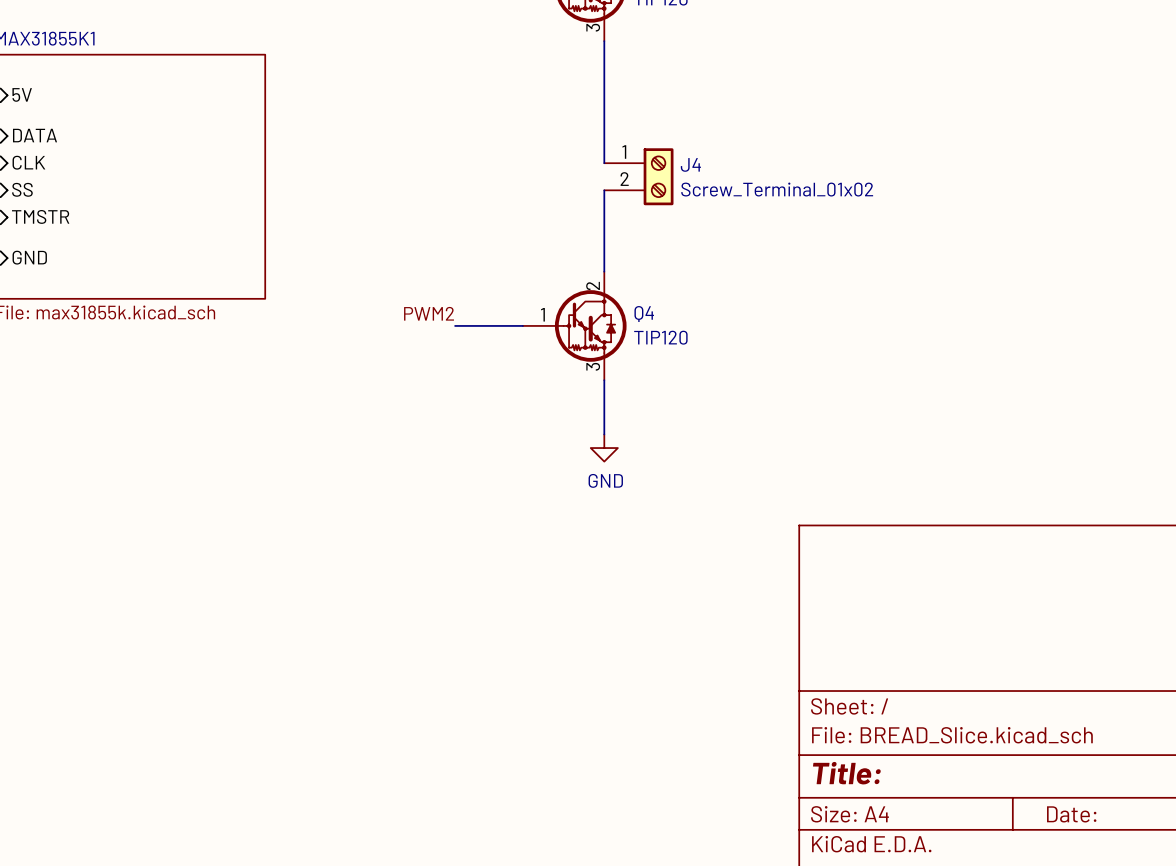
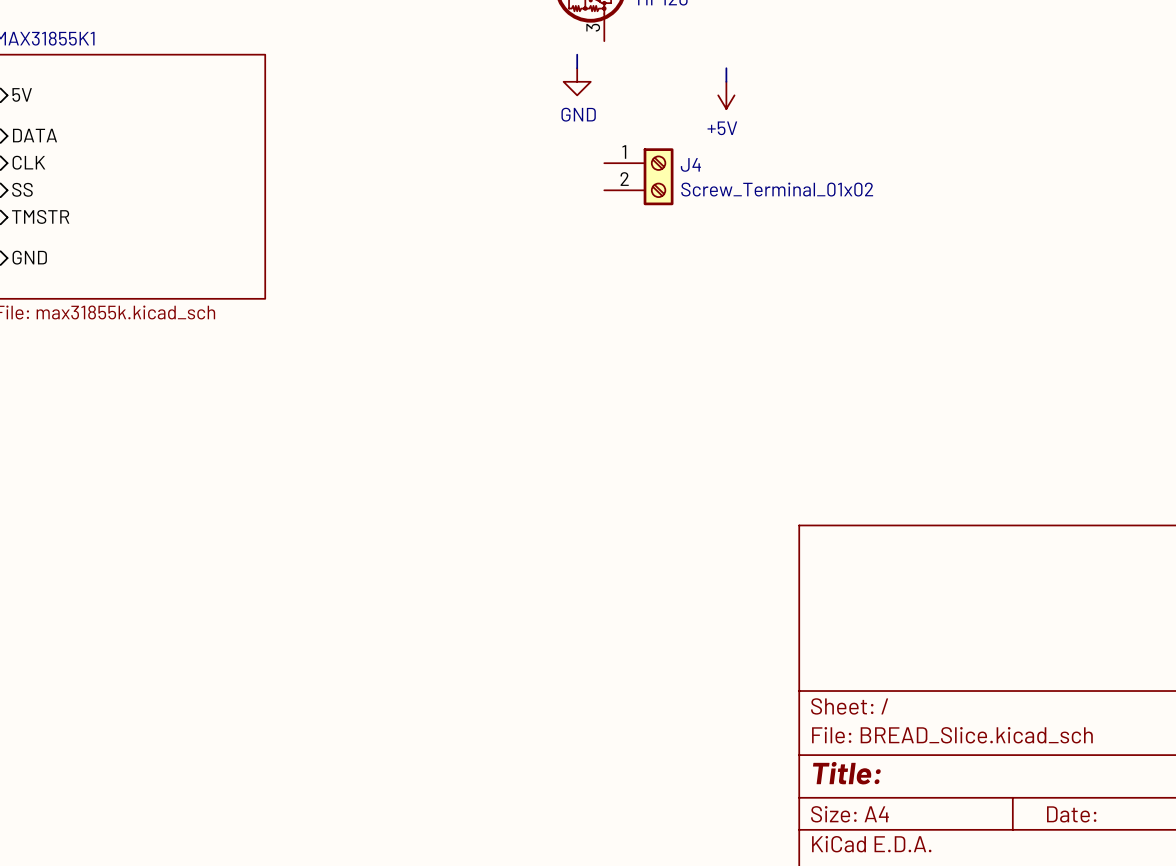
wire: (604, 41) (604, 163) -> none
wire: none -> (577, 54) (577, 68)
wire: none -> (726, 68) (726, 81)
power symbol: none -> GND (577, 81)
power symbol: none -> +5V (726, 95)
wire: (604, 190) (604, 271) -> none
label: PWM2 (429, 313) -> none
wire: (455, 325) (522, 325) -> none
Q4: TIP120 (574, 325) -> none
wire: (604, 380) (604, 434) -> none
power symbol: GND (604, 448) -> none

